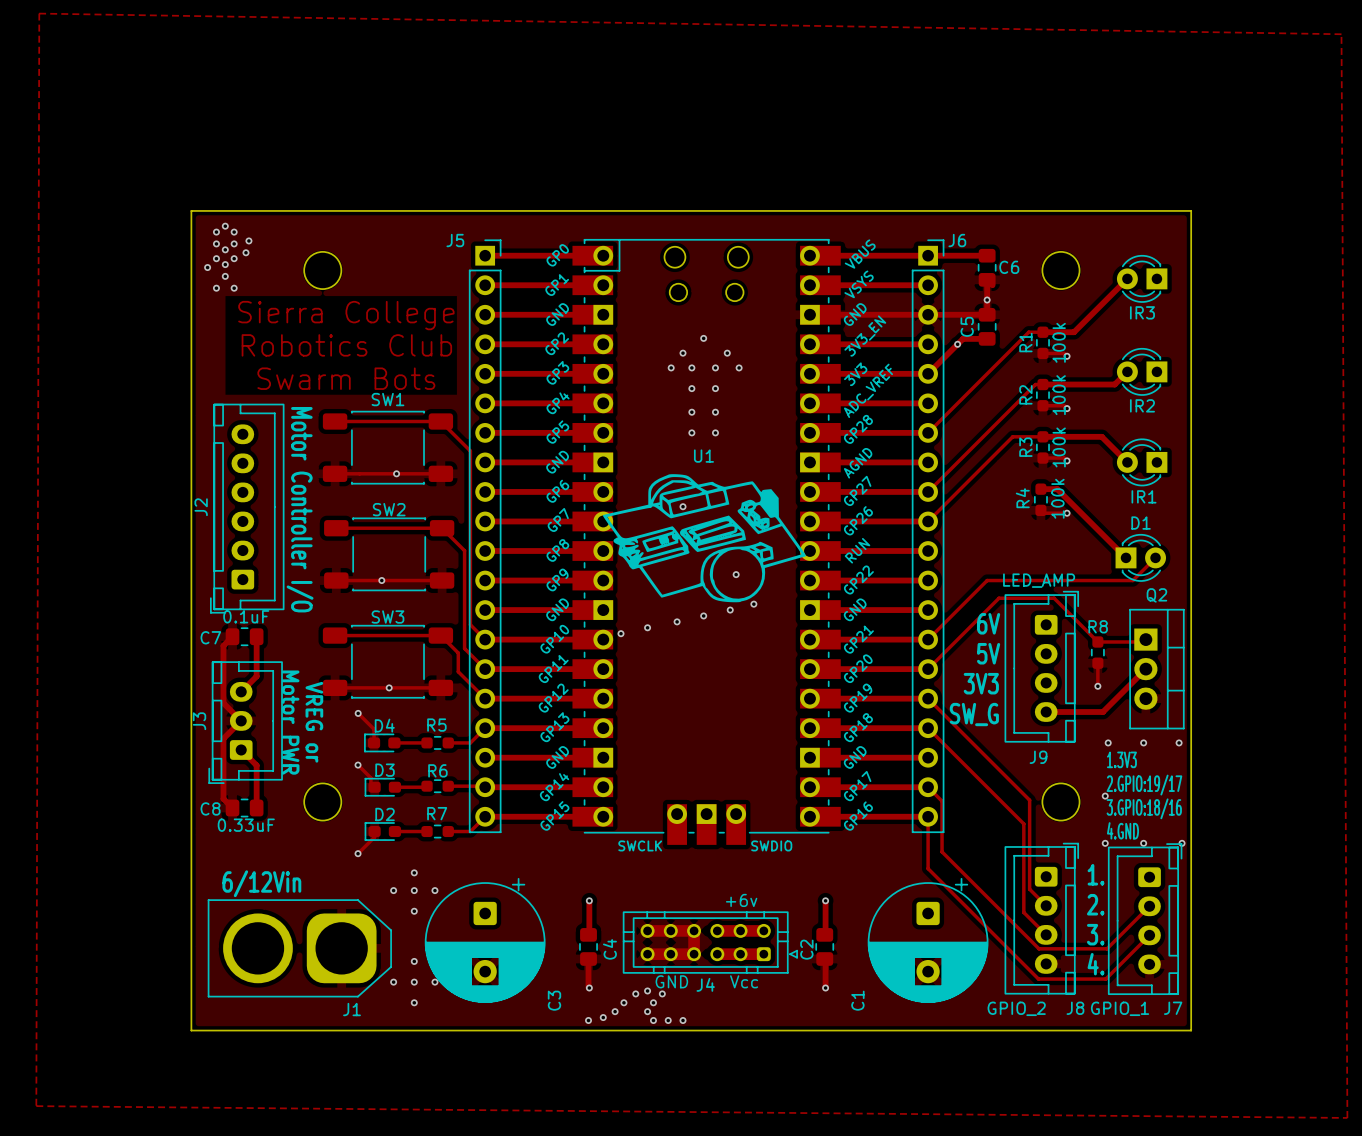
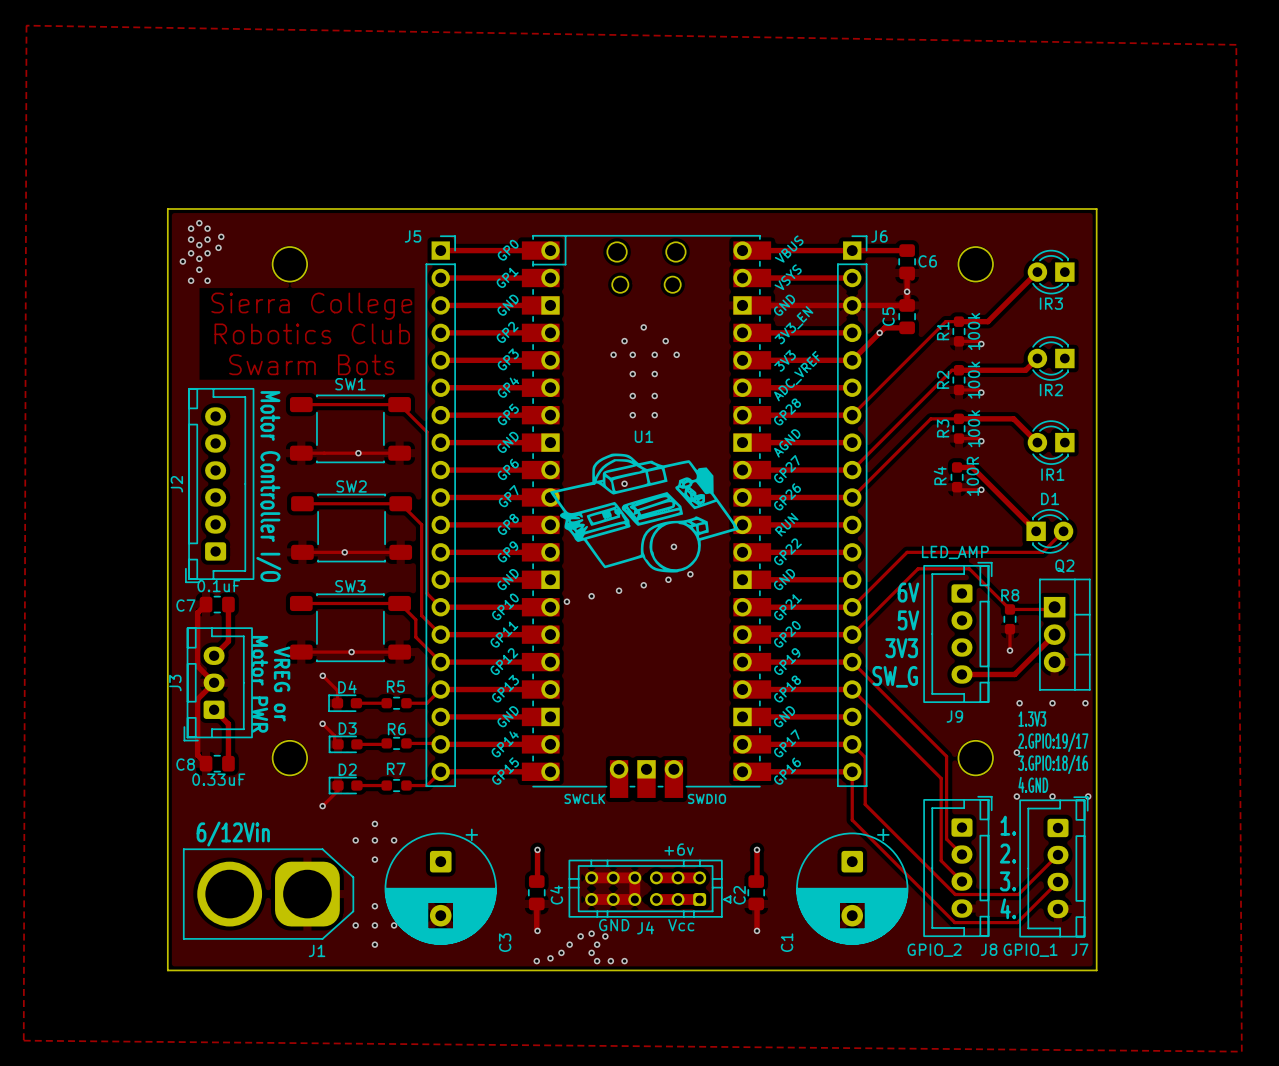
R4 value: 100k (1057, 498) -> 100R (972, 476)

